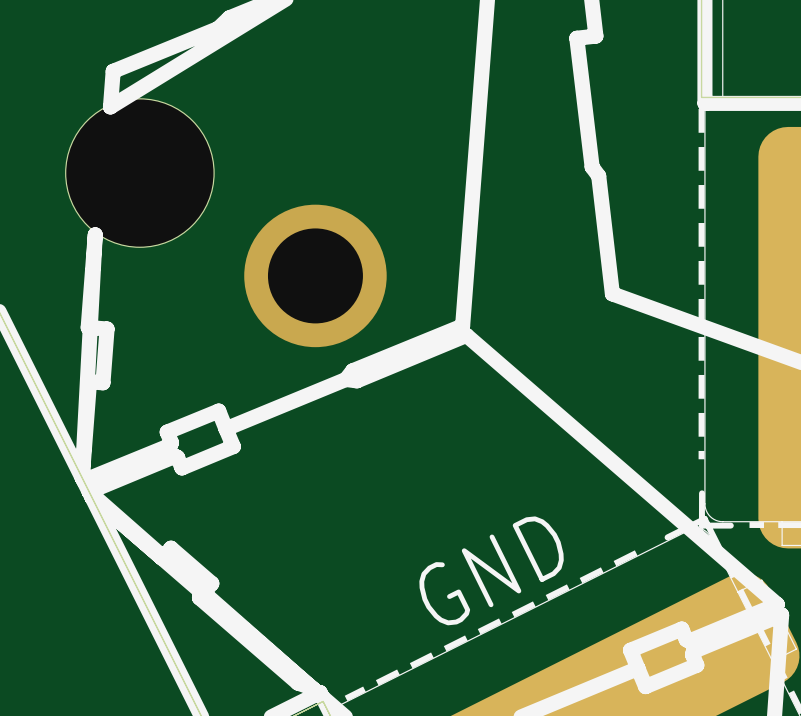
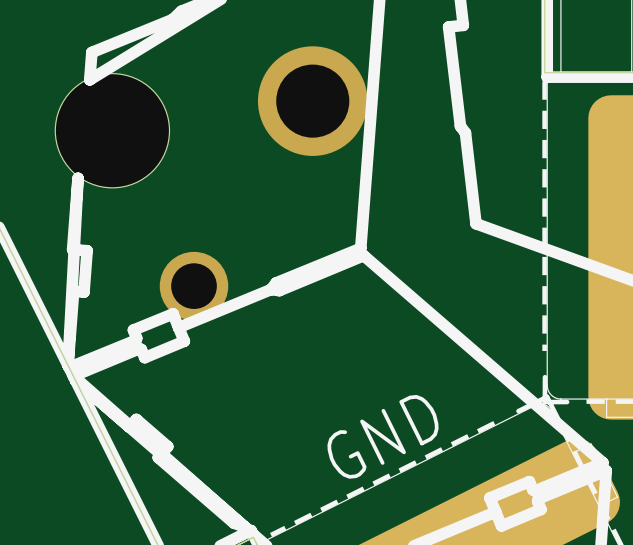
via position: (315, 275) -> (312, 101)
via: none -> (194, 286)

